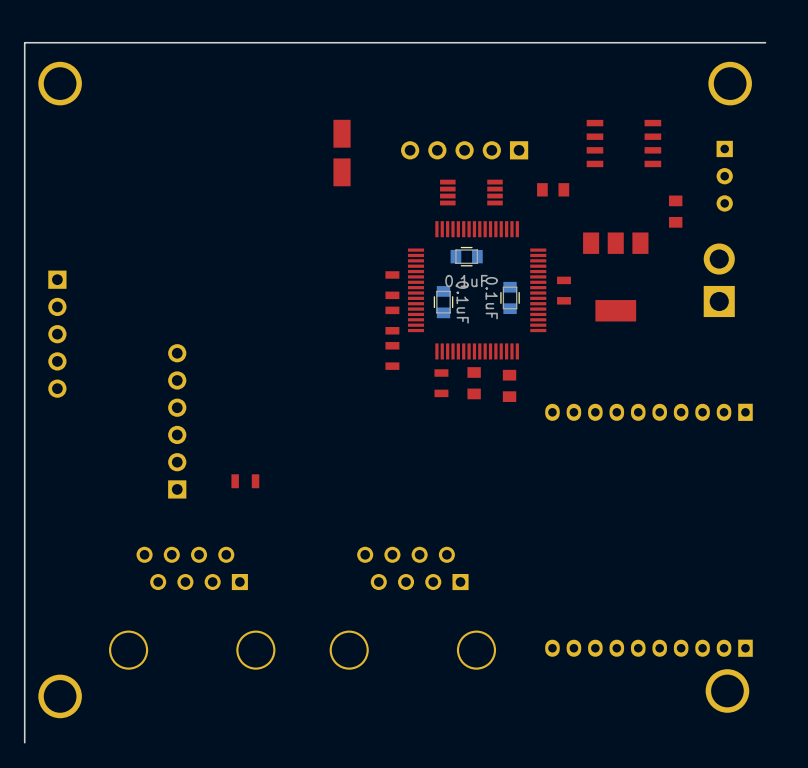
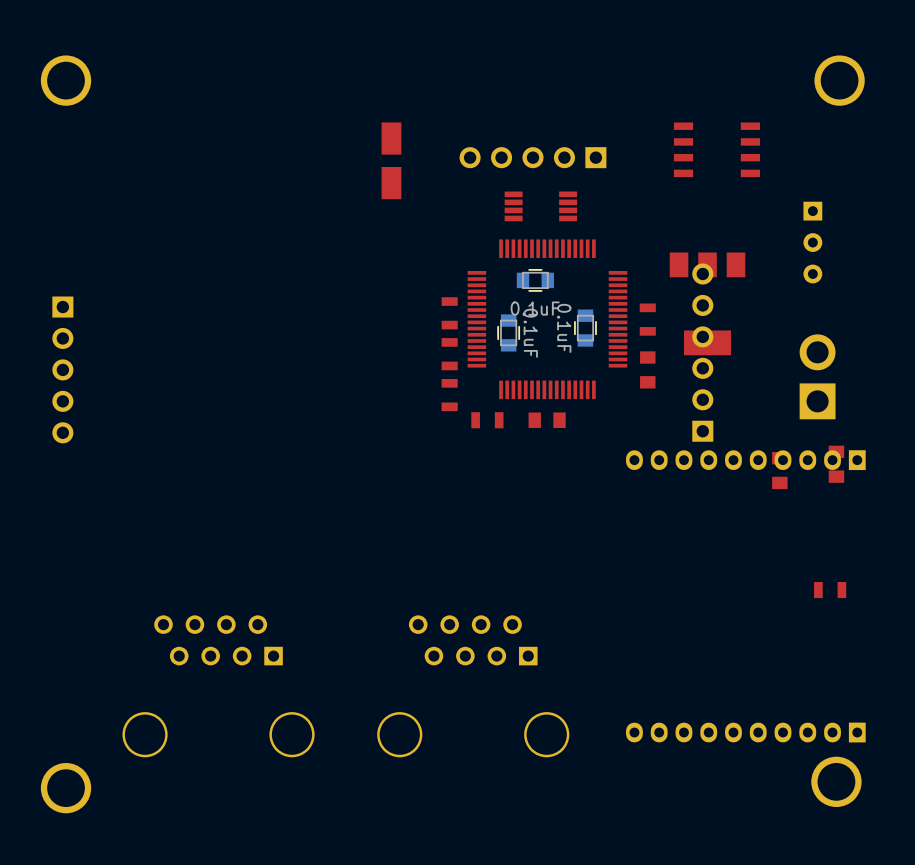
board edge: (765, 42) (24, 42) (24, 742) -> none
part position: (724, 176) -> (812, 242)
part: (553, 189) -> none
part: (675, 211) -> none
part position: (719, 280) -> (817, 376)
part: none -> (702, 352)
part: none -> (647, 369)
part rotation: 0° (441, 383) -> 90° clockwise (487, 420)
part position: (441, 383) -> (487, 420)
part rotation: 0° (474, 383) -> 90° clockwise (547, 420)
part: (509, 385) -> none
part: none -> (836, 464)
part: (177, 421) -> none
part: none -> (779, 470)
part: (245, 481) -> none
part: none -> (830, 590)

